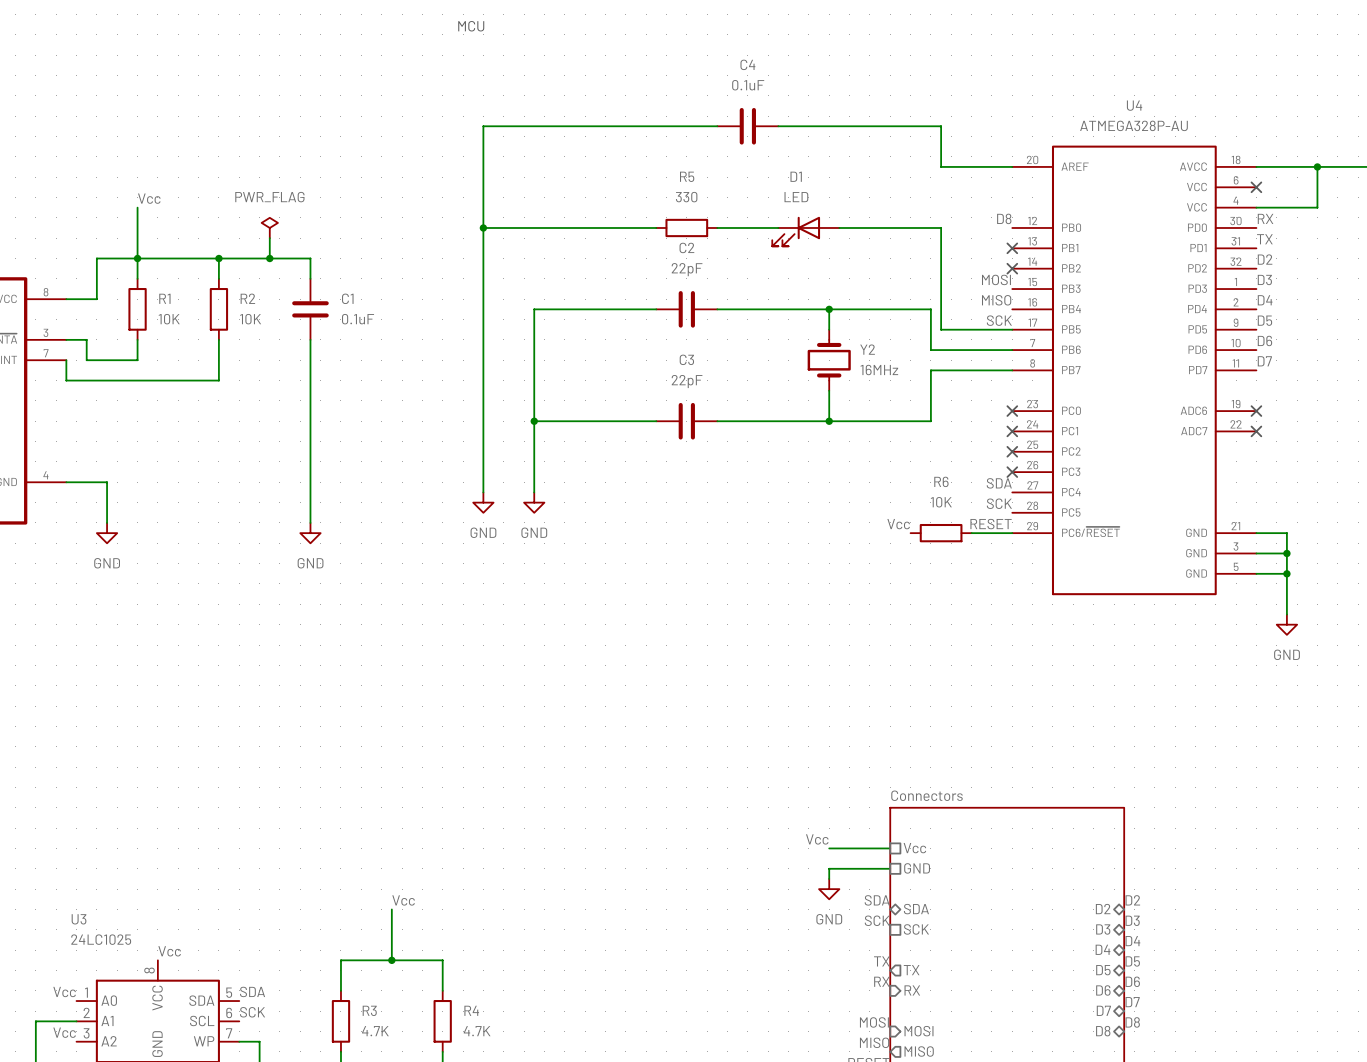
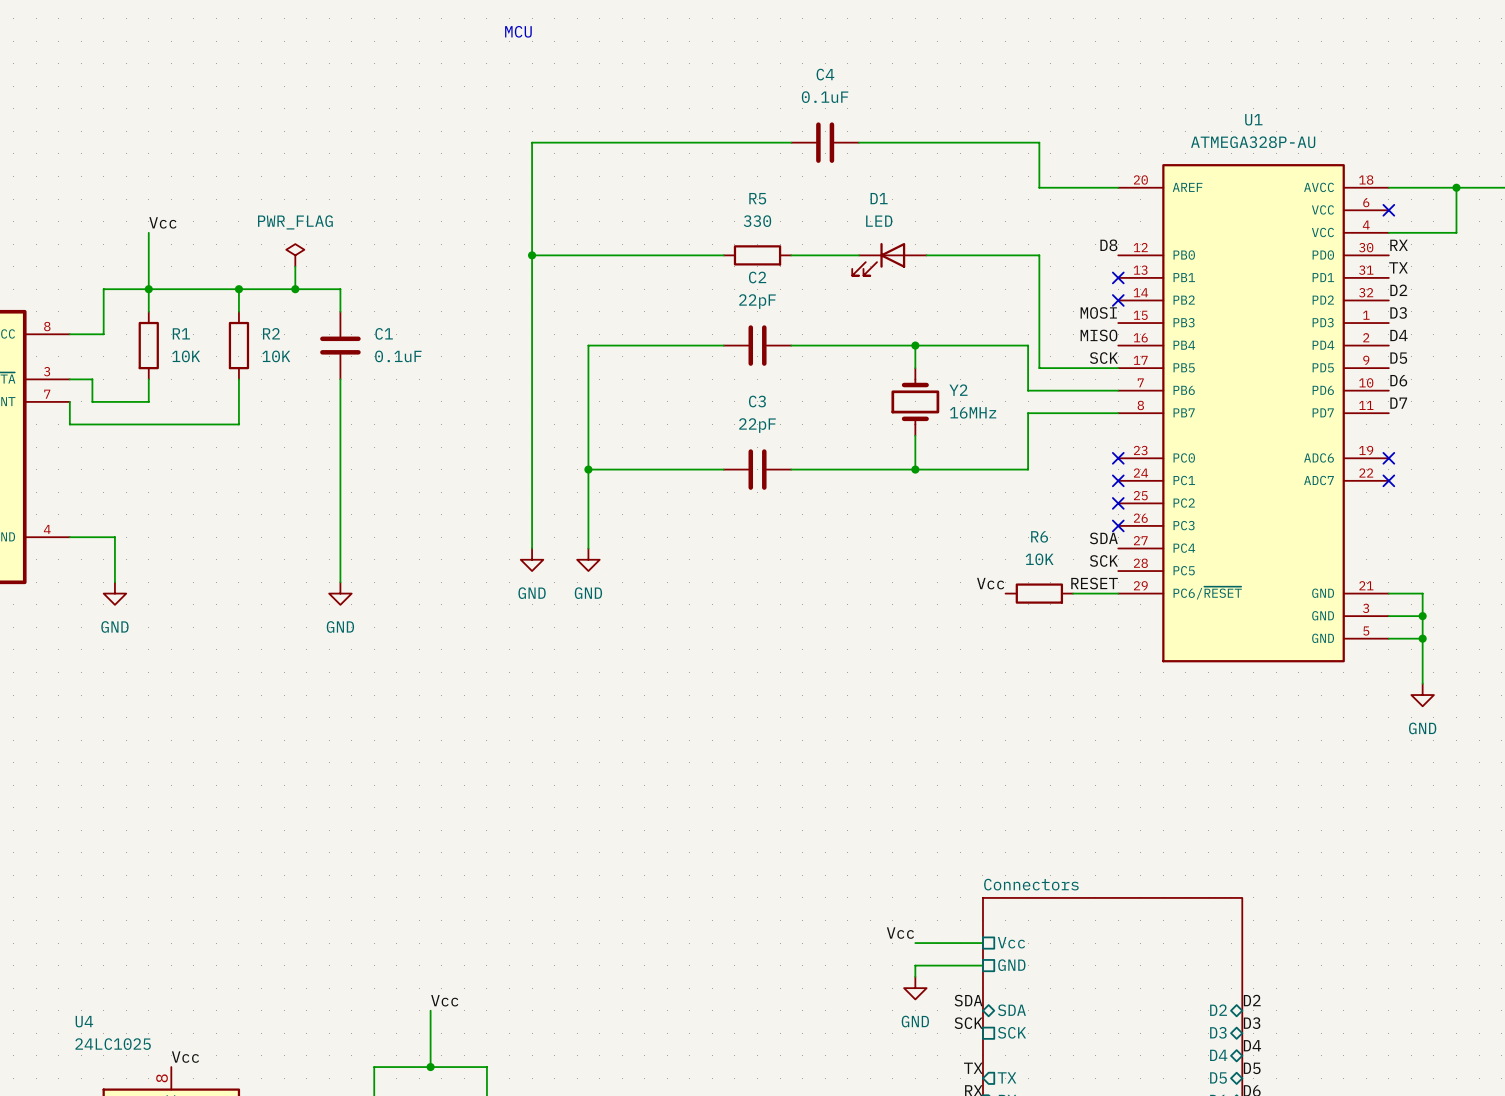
U4 name: U4 (1134, 105) -> U1 (1253, 119)
U3 name: U3 (79, 919) -> U4 (84, 1021)

